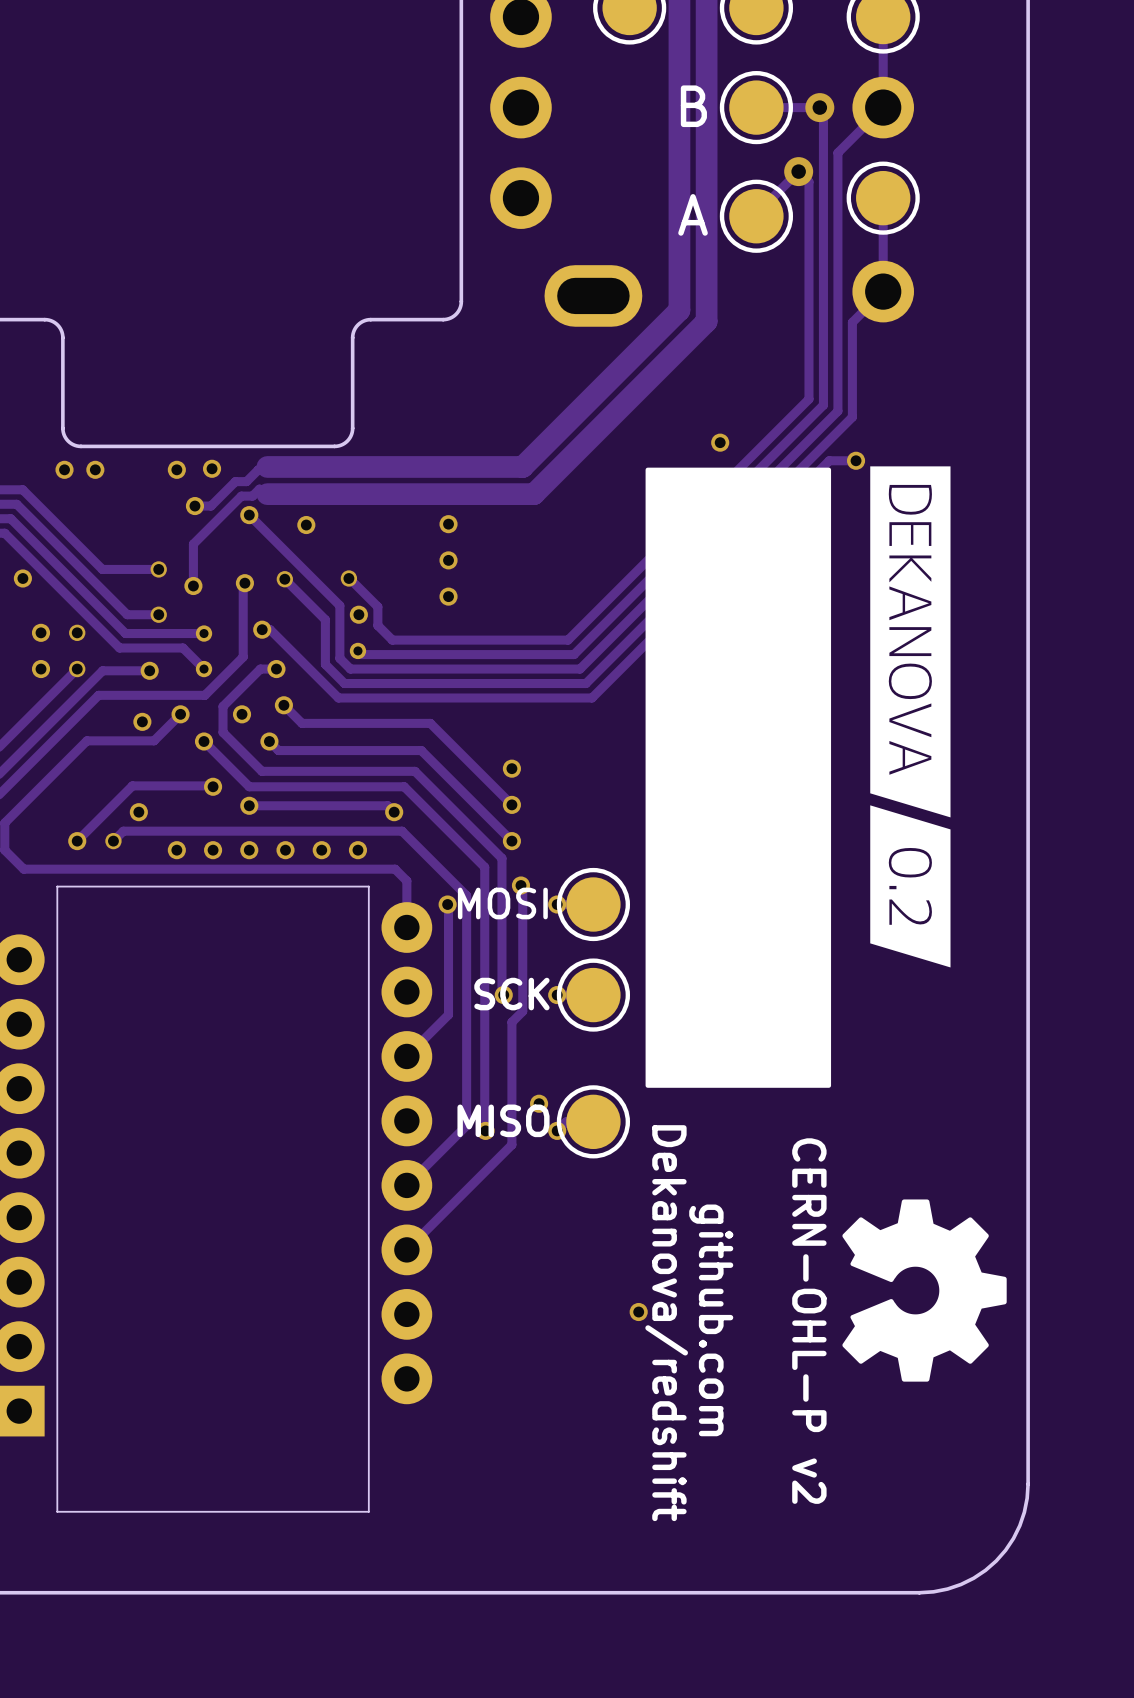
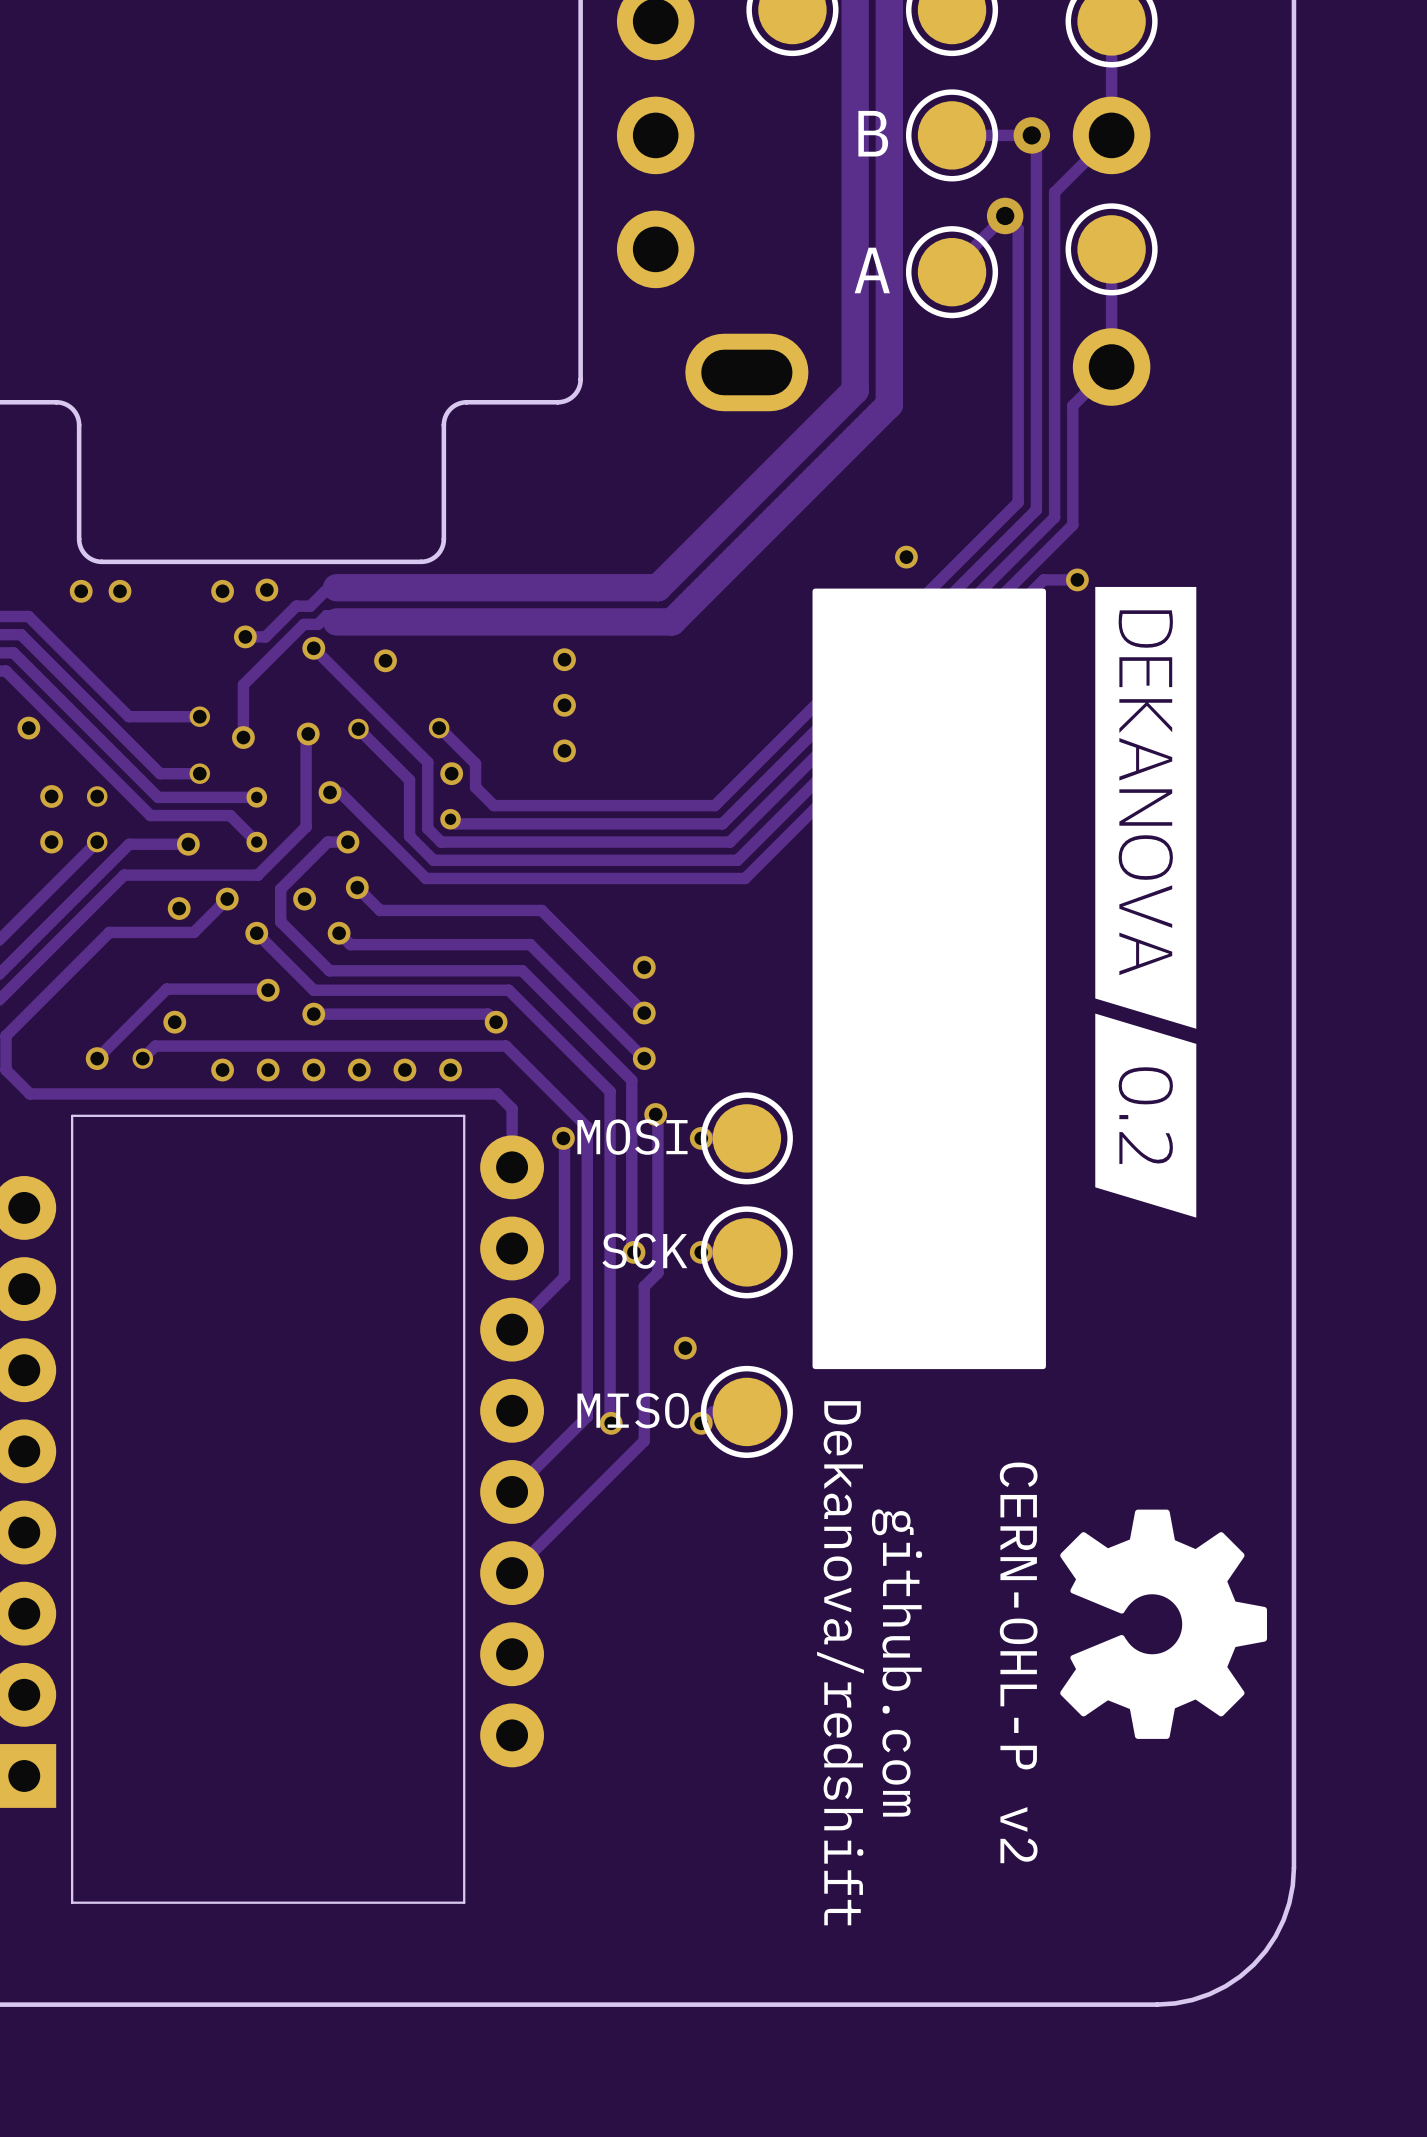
via position: (539, 1103) -> (685, 1348)
via: (638, 1312) -> none

